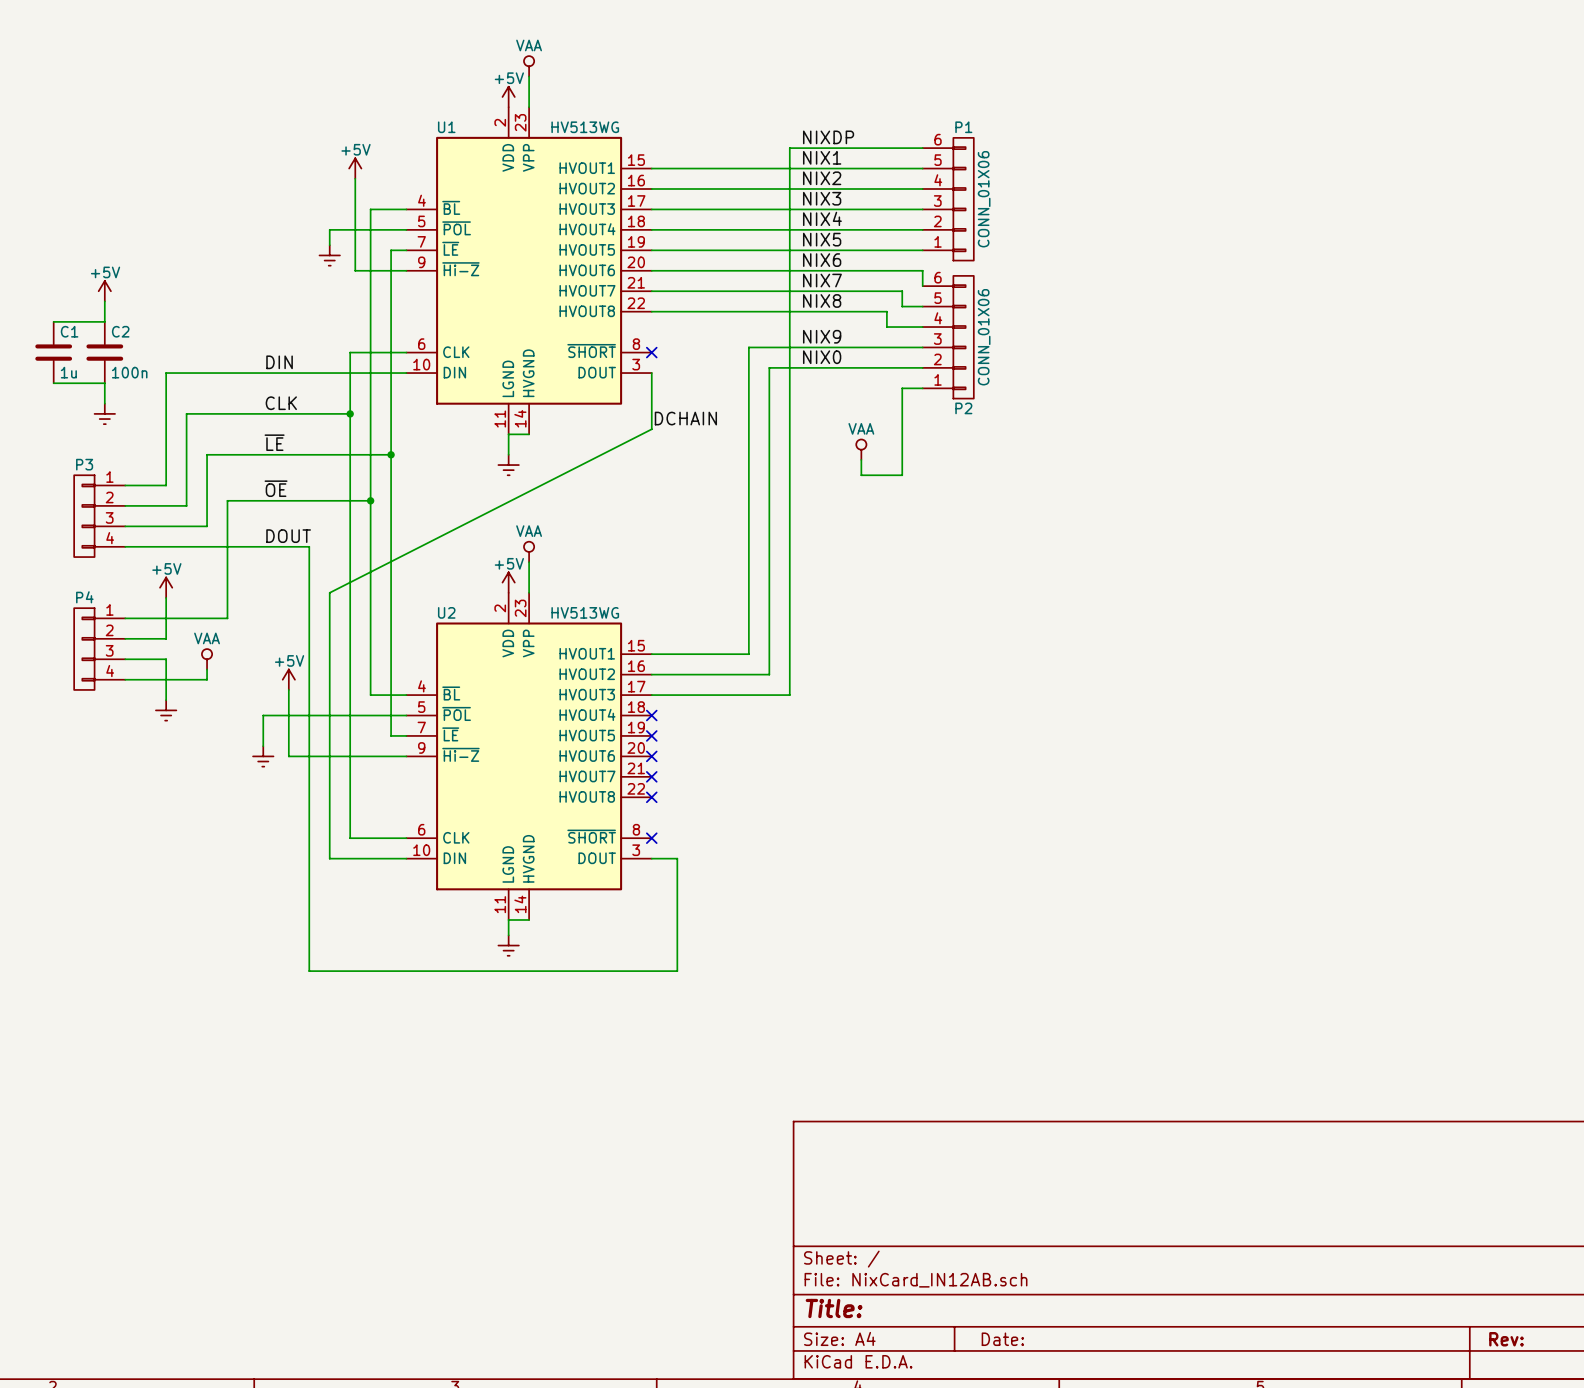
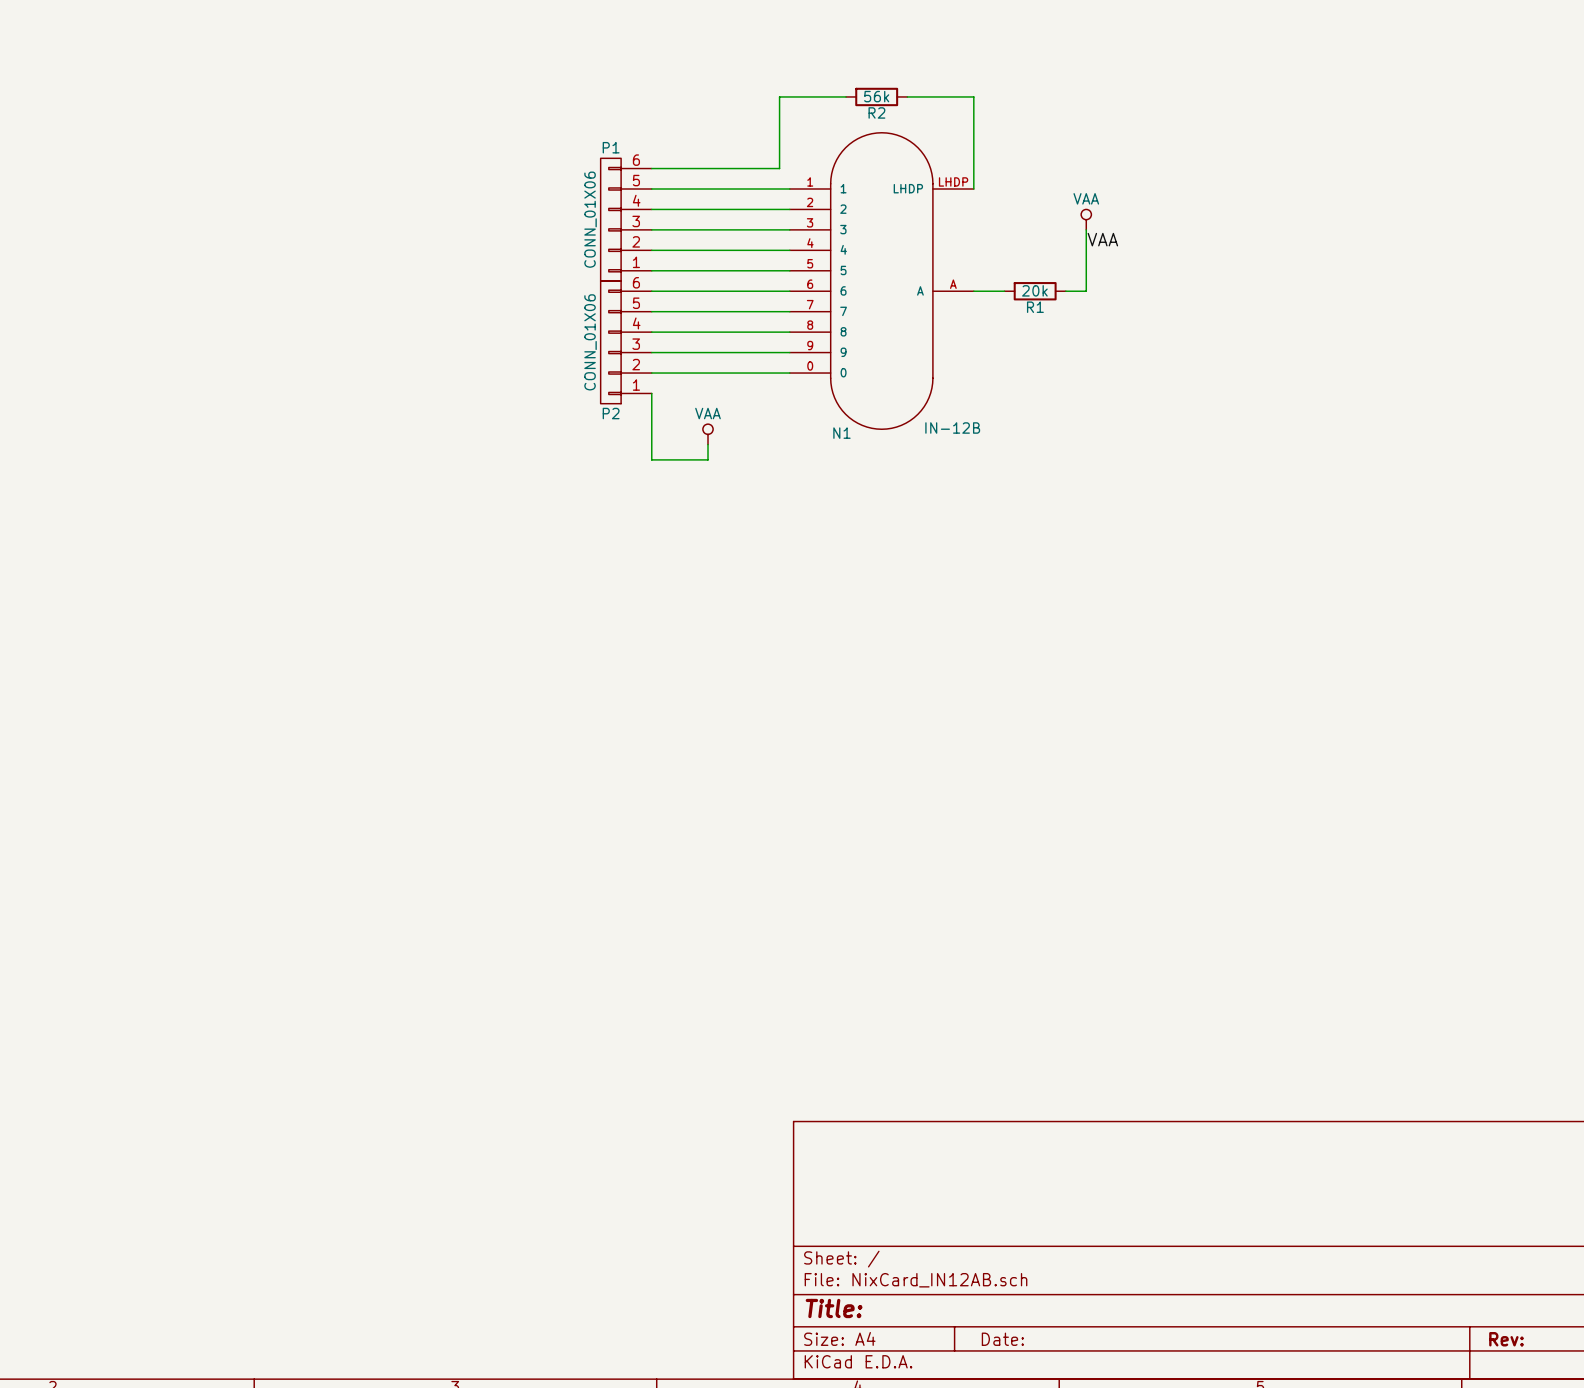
power symbol: VAA (529, 66) -> none
wire: (529, 76) (529, 107) -> none
power symbol: +5V (508, 96) -> none
R2: none -> 56k (876, 96)
wire: none -> (907, 96) (973, 96) (973, 188)
label: NIXDP (828, 137) -> none
wire: (922, 148) (789, 148) (789, 695) (651, 695) -> none
label: NIX1 (822, 157) -> none
power symbol: +5V (355, 168) -> none
wire: (779, 168) (922, 168) -> (779, 168) (779, 96) (846, 96)
wire: (355, 178) (355, 270) (406, 270) -> none
label: NIX2 (822, 178) -> none
wire: (789, 188) (922, 188) -> none
label: NIX3 (822, 198) -> none
P1 position: (948, 199) -> (626, 219)
P1 flip: as is (963, 199) -> left-right (610, 219)
wire: (406, 209) (370, 209) (370, 695) (406, 695) -> none
wire: (789, 209) (922, 209) -> none
label: NIX4 (822, 218) -> none
power symbol: none -> VAA (1086, 219)
wire: (406, 229) (329, 229) (329, 245) -> none
wire: (789, 229) (922, 229) -> none
wire: none -> (1086, 229) (1086, 291) (1065, 291)
label: NIX5 (822, 239) -> none
label: none -> VAA (1102, 239)
wire: (406, 250) (391, 250) (391, 735) (406, 735) -> none
wire: (789, 250) (922, 250) -> none
power symbol: (329, 255) -> none
label: NIX6 (822, 260) -> none
U1: HV513WG (529, 270) -> none
wire: (789, 270) (922, 270) (922, 286) -> none
label: NIX7 (822, 280) -> none
N1: none -> IN-12B (881, 281)
power symbol: +5V (104, 291) -> none
wire: (789, 291) (902, 291) (902, 306) (922, 306) -> none
wire: none -> (973, 291) (1004, 291)
R1: none -> 20k (1035, 291)
label: NIX8 (822, 300) -> none
wire: (104, 301) (104, 321) (53, 321) -> none
wire: (789, 311) (886, 311) (886, 327) (922, 327) -> none
wire: none -> (651, 332) (789, 332)
label: NIX9 (822, 336) -> none
P2 position: (948, 337) -> (626, 342)
P2 flip: as is (963, 337) -> left-right (610, 342)
wire: (922, 347) (748, 347) (748, 654) (651, 654) -> none
C1: 1u (53, 352) -> none
C2: 100n (104, 352) -> none
wire: (406, 352) (350, 352) (350, 838) (406, 838) -> none
wire: none -> (651, 352) (789, 352)
no-connect mark: (651, 352) -> none
label: NIX0 (822, 357) -> none
label: DIN (279, 362) -> none
wire: (922, 367) (769, 367) (769, 674) (651, 674) -> none
wire: (406, 373) (166, 373) (166, 485) (125, 485) -> none
wire: (651, 373) (651, 393) -> (651, 373) (789, 373)
wire: (53, 383) (104, 383) (104, 403) -> none
wire: (922, 388) (902, 388) (902, 475) (861, 475) (861, 459) -> none
label: CLK (281, 403) -> none
power symbol: (104, 413) -> none
wire: (350, 413) (186, 413) (186, 505) (125, 505) -> none
junction: (350, 413) -> none
label: DCHAIN (685, 418) -> none
wire: (651, 429) (329, 592) (329, 858) (406, 858) -> (651, 429) (651, 459) (708, 459) (708, 444)
wire: (529, 434) (508, 434) (508, 454) -> none
power symbol: none -> VAA (708, 434)
label: ~{LE} (274, 442) -> none
power symbol: VAA (861, 449) -> none
wire: (391, 454) (207, 454) (207, 526) (125, 526) -> none
junction: (391, 454) -> none
power symbol: (508, 465) -> none
label: ~{OE} (276, 488) -> none
wire: (370, 500) (227, 500) (227, 618) (125, 618) -> none
junction: (370, 500) -> none
P3: (99, 516) -> none
label: DOUT (288, 536) -> none
wire: (125, 546) (309, 546) (309, 971) (677, 971) (677, 858) (651, 858) -> none
power symbol: VAA (529, 551) -> none
wire: (529, 562) (529, 592) -> none
power symbol: +5V (508, 582) -> none
power symbol: +5V (166, 587) -> none
wire: (166, 597) (166, 638) (125, 638) -> none
P4: (99, 649) -> none
wire: (125, 659) (166, 659) (166, 700) -> none
power symbol: VAA (207, 659) -> none
wire: (207, 669) (207, 679) (125, 679) -> none
power symbol: +5V (288, 679) -> none
wire: (288, 689) (288, 756) (406, 756) -> none
power symbol: (166, 710) -> none
wire: (406, 715) (263, 715) (263, 746) -> none
no-connect mark: (651, 715) -> none
no-connect mark: (651, 735) -> none
power symbol: (263, 756) -> none
U2: HV513WG (529, 756) -> none
no-connect mark: (651, 756) -> none
no-connect mark: (651, 776) -> none
no-connect mark: (651, 797) -> none
no-connect mark: (651, 838) -> none
wire: (529, 919) (508, 919) (508, 935) -> none
power symbol: (508, 945) -> none

